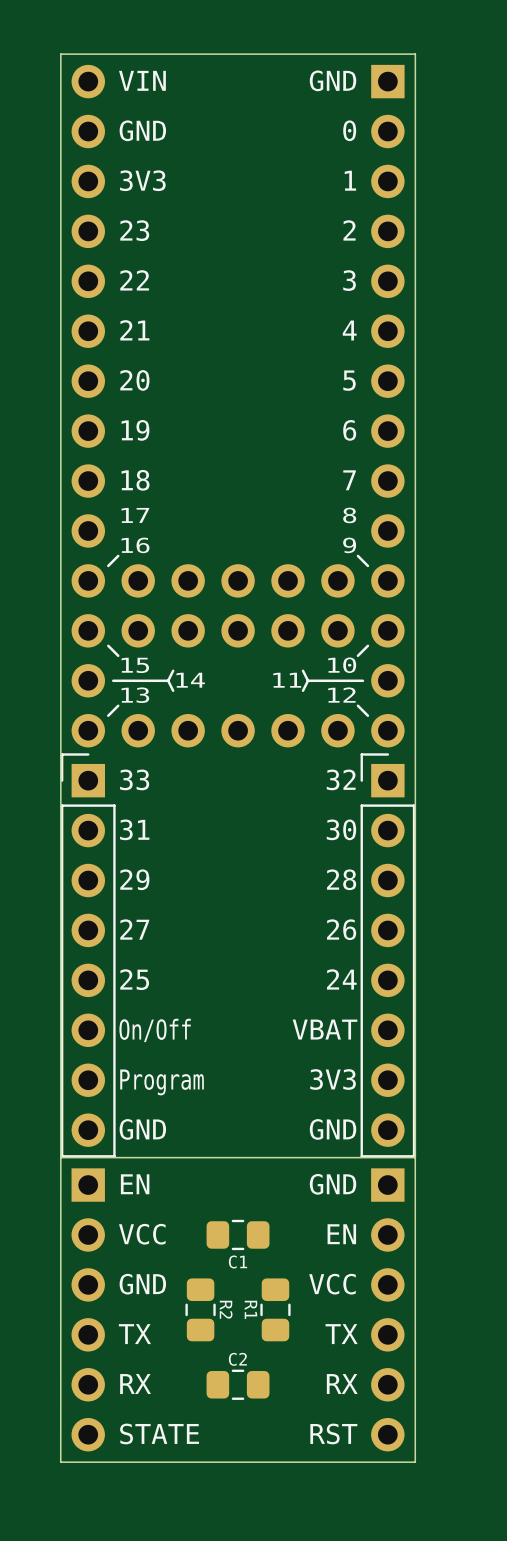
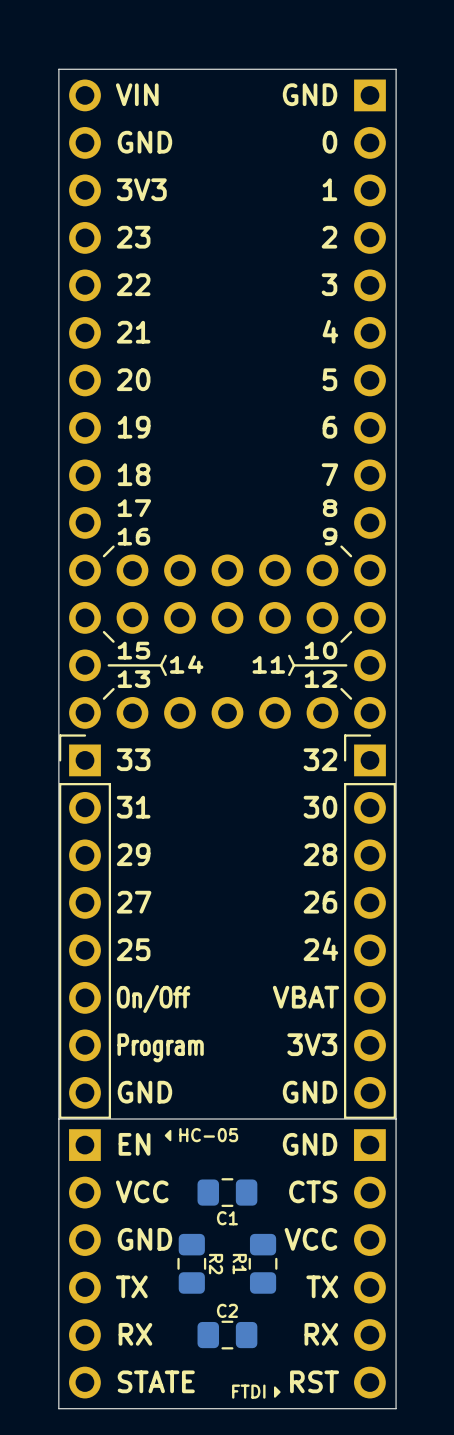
drawing: none -> [164, 1129, 172, 1142]
text: none -> HC-05 (208, 1135)
text: EN (341, 1234) -> CTS (313, 1191)
drawing: none -> [273, 1386, 281, 1398]
text: none -> FTDI (248, 1391)

